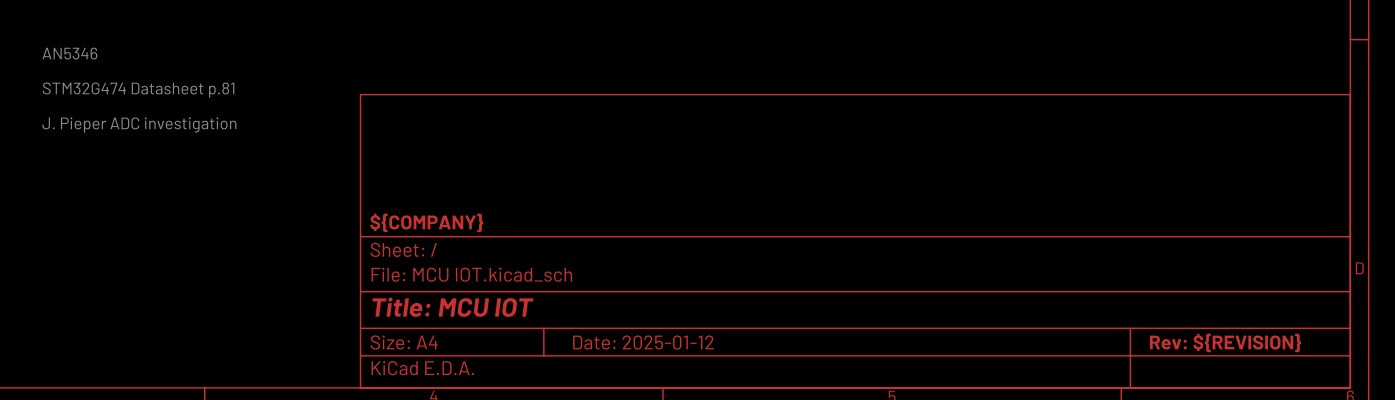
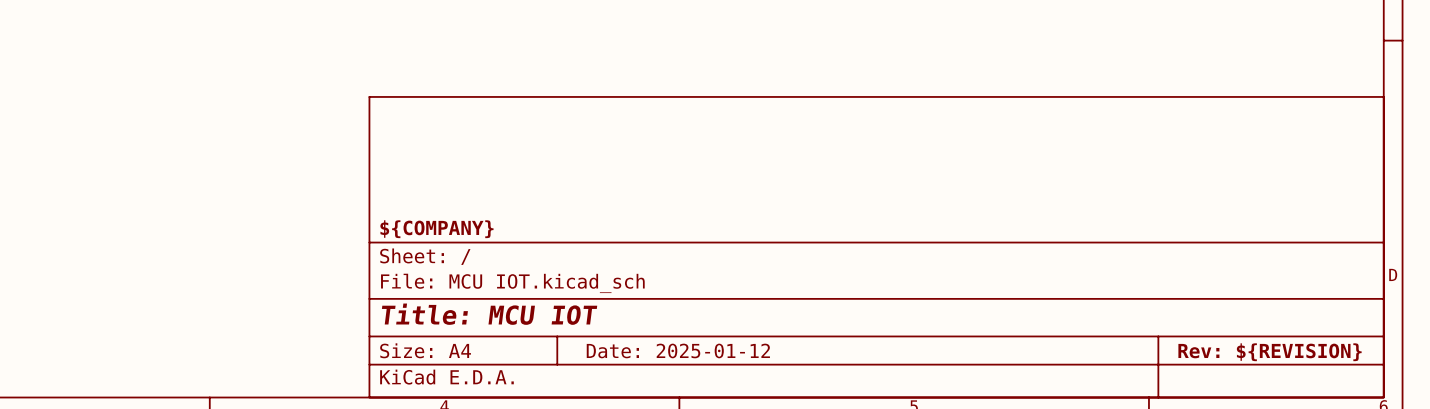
text: AN5346 (69, 53) -> none
text: STM32G474 Datasheet p.81 (138, 90) -> none
text: J. Pieper ADC investigation (139, 124) -> none

